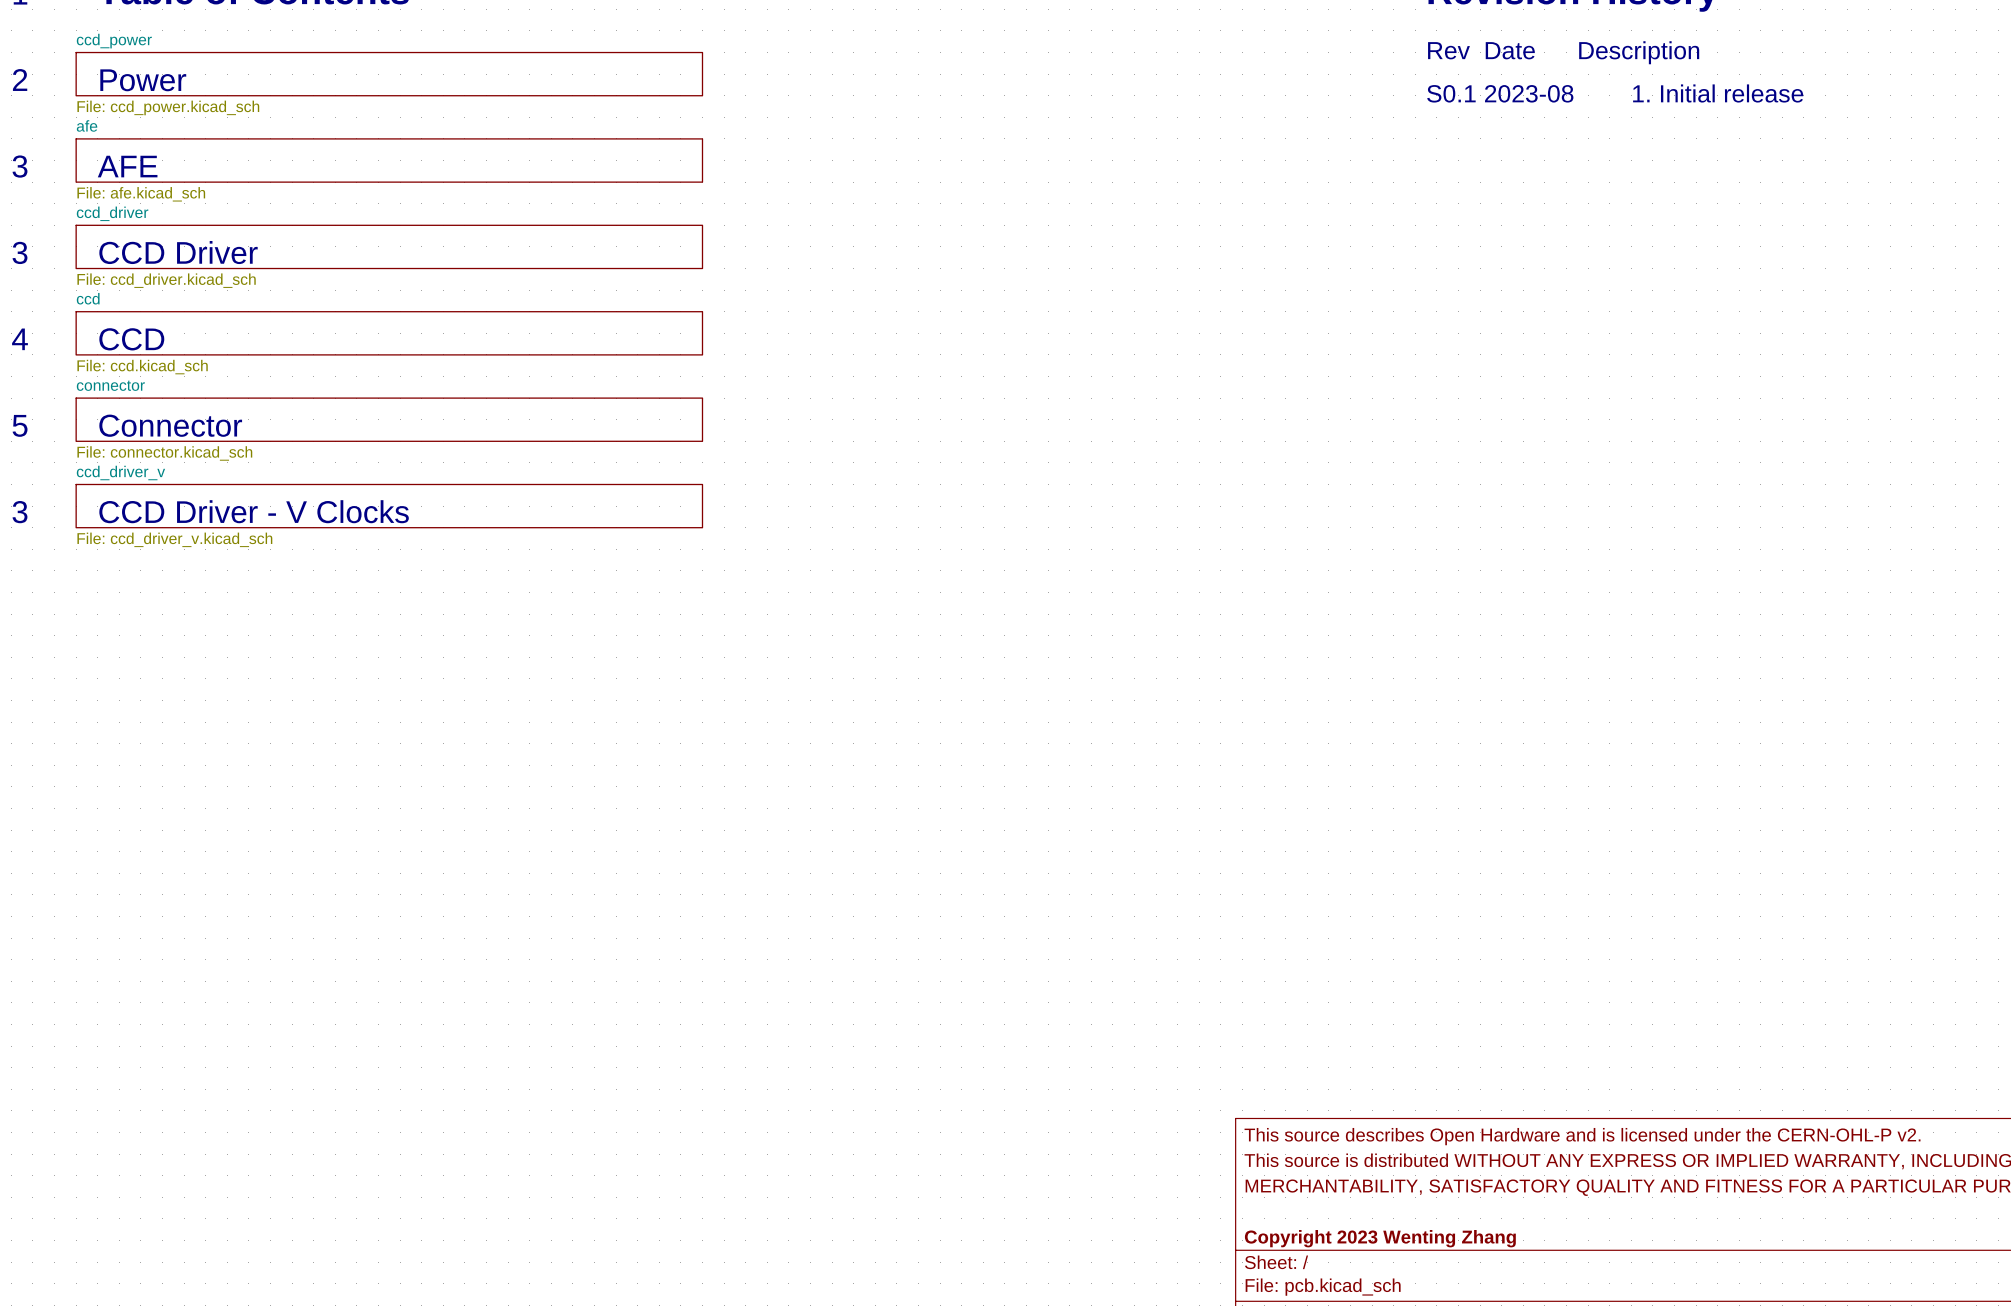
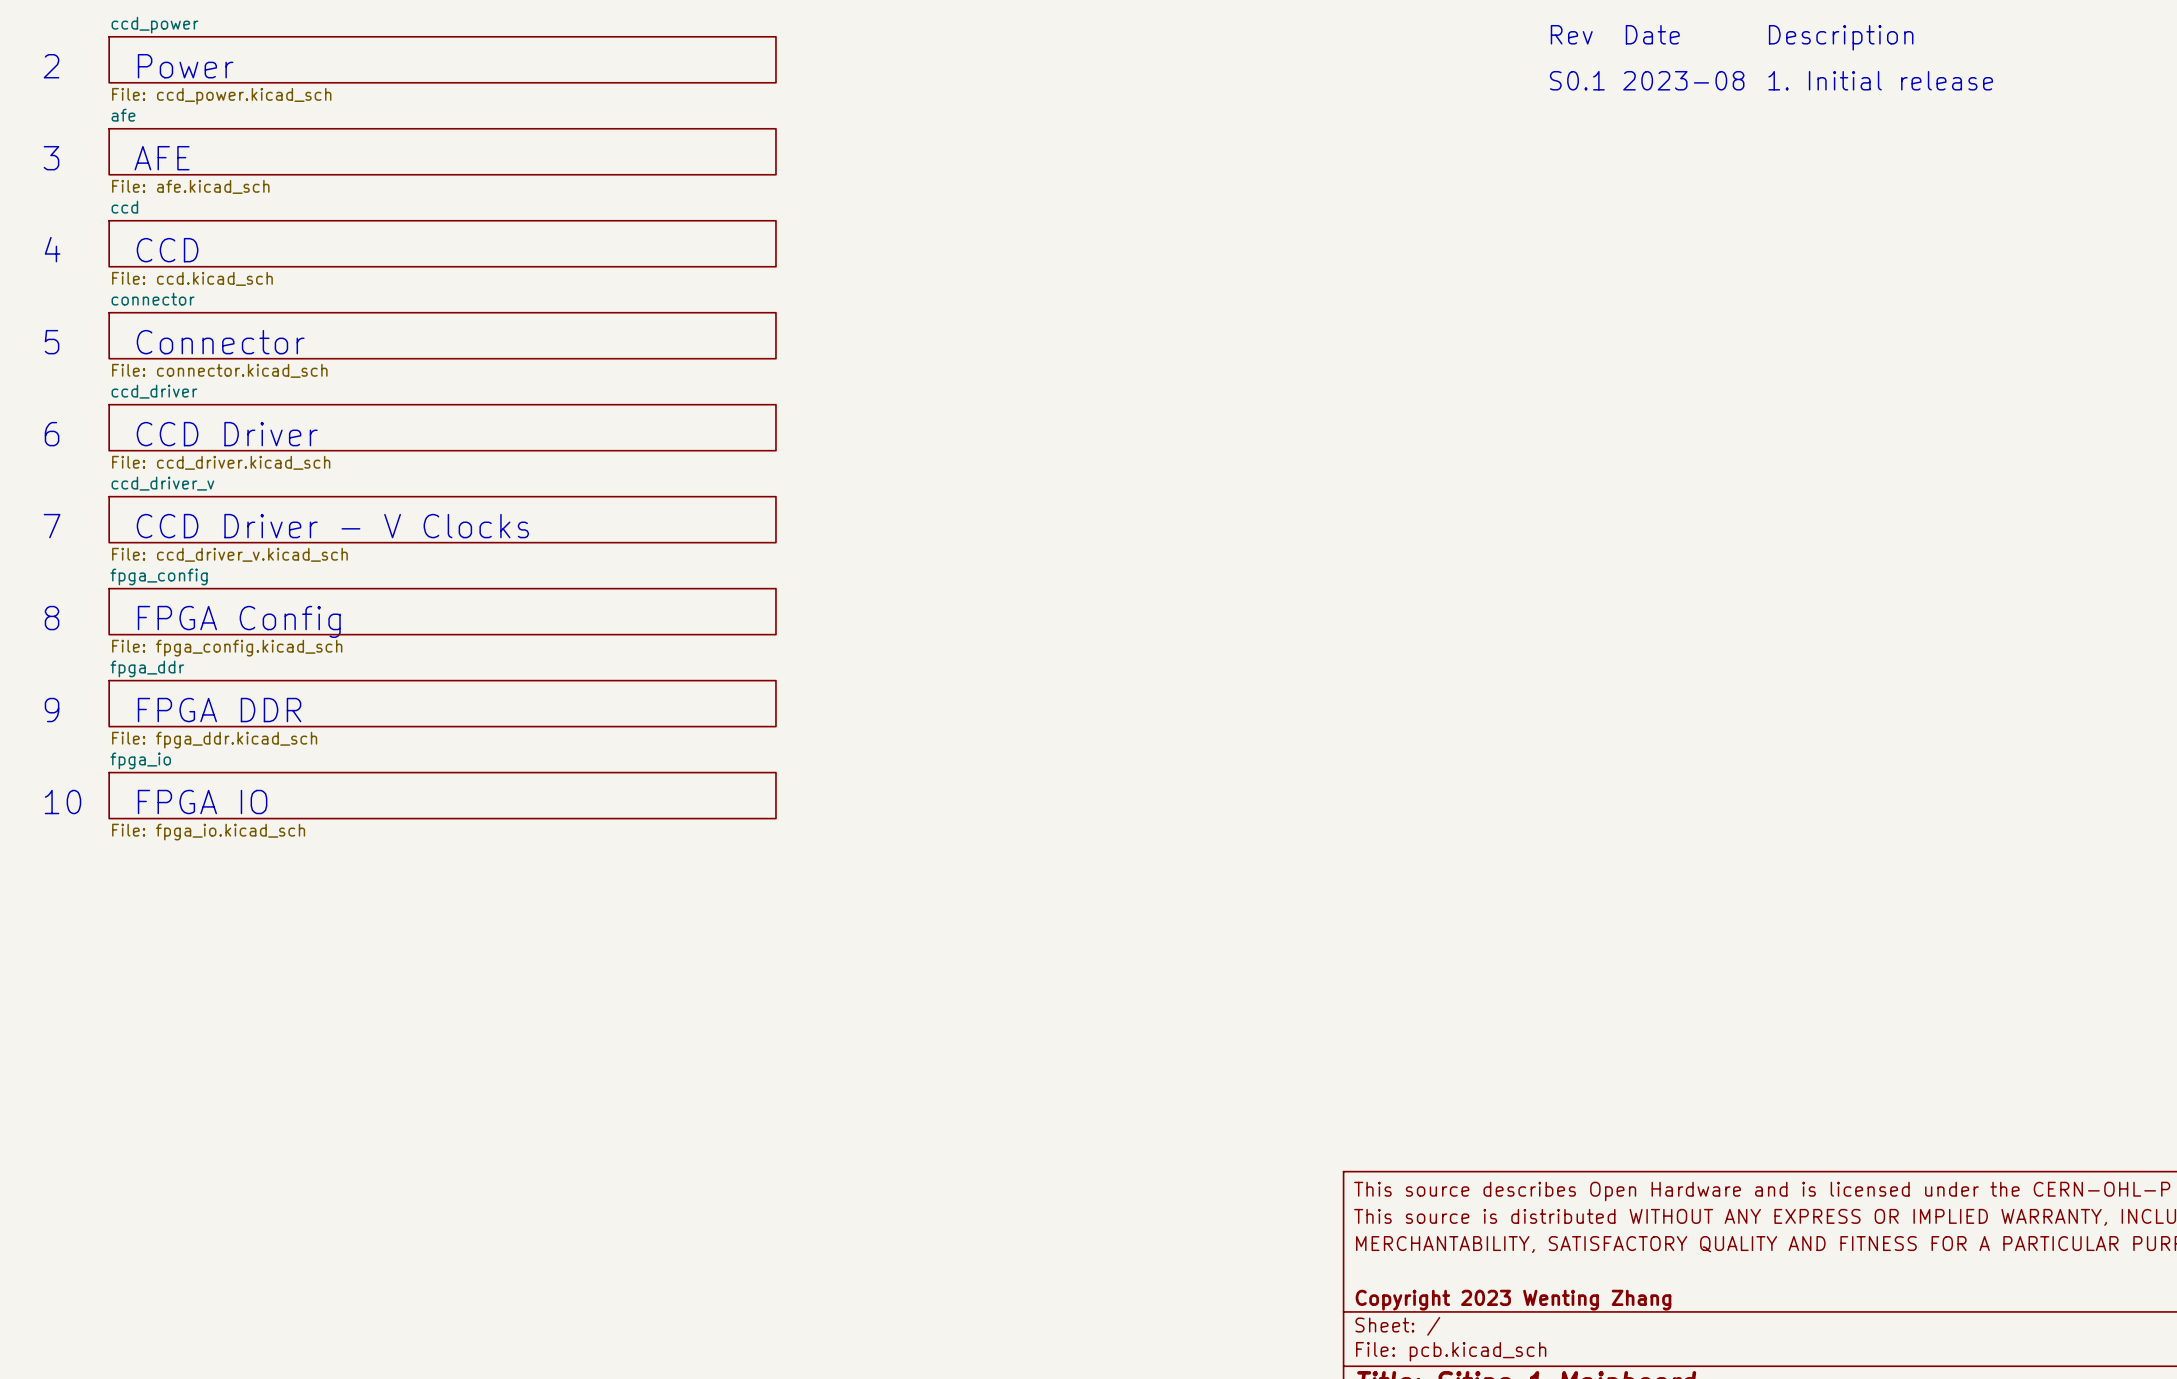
sheet ccd_driver name: ccd_driver (112, 213) -> ccd (124, 207)
text: 3 (19, 252) -> 4 (52, 249)
text: CCD Driver (178, 252) -> CCD (167, 250)
sheet ccd_driver value: File: ccd_driver.kicad_sch (166, 280) -> File: ccd.kicad_sch (192, 278)
sheet ccd name: ccd (88, 298) -> connector (153, 299)
text: 4 (19, 339) -> 5 (52, 342)
text: CCD (131, 339) -> Connector (220, 342)
sheet ccd value: File: ccd.kicad_sch (142, 367) -> File: connector.kicad_sch (219, 370)
sheet connector name: connector (110, 385) -> ccd_driver (154, 391)
text: 5 (20, 425) -> 6 (52, 434)
text: Connector (170, 425) -> CCD Driver (227, 434)
sheet connector value: File: connector.kicad_sch (164, 453) -> File: ccd_driver.kicad_sch (221, 462)
text: 3 (19, 512) -> 7 (52, 526)
sheet fpga_config: none -> File: fpga_config.kicad_sch (442, 611)
text: none -> 8 (52, 618)
text: none -> FPGA Config (239, 621)
sheet fpga_ddr: none -> File: fpga_ddr.kicad_sch (442, 703)
text: none -> 9 (52, 710)
text: none -> FPGA DDR (219, 710)
sheet fpga_io: none -> File: fpga_io.kicad_sch (442, 795)
text: none -> 10 (62, 802)
text: none -> FPGA IO (202, 802)

